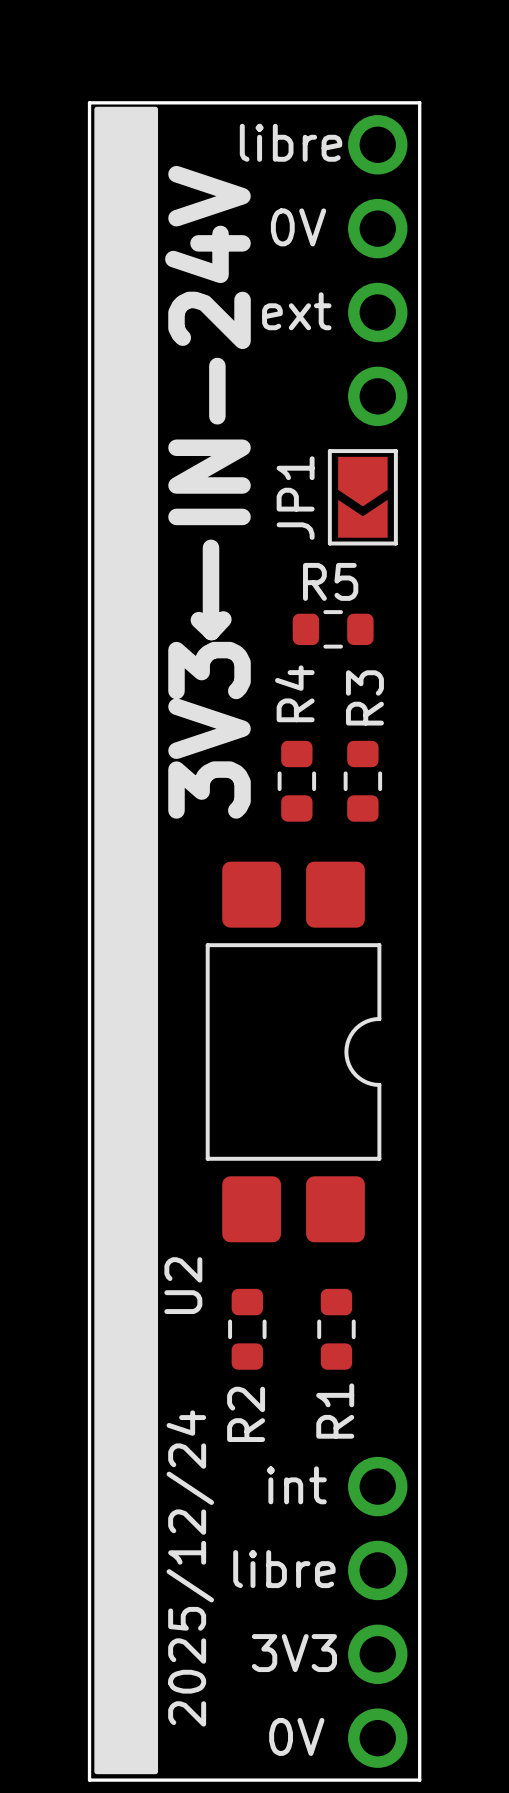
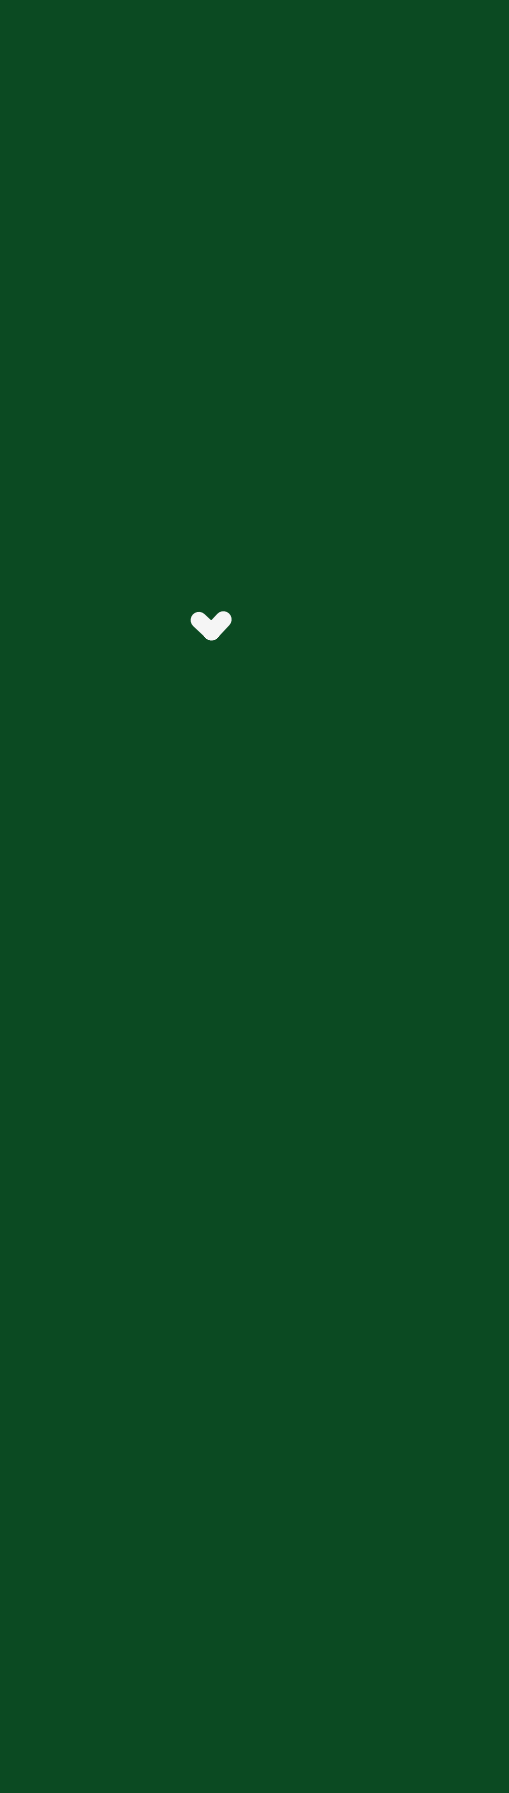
board edge: (89, 102) (89, 1780) (419, 1780) (419, 102) (89, 102) -> none
drawing: [94, 106, 159, 1775] -> none
text: libre (291, 142) -> none
part: (377, 144) -> none
text: 0V (298, 227) -> none
part: (377, 228) -> none
text: ext (296, 311) -> none
part: (377, 312) -> none
text: IN-24V (207, 345) -> none
part: (377, 396) -> none
JP1: (362, 497) -> none
line: (211, 547) (211, 631) -> none
R5: (333, 629) -> none
text: 3V3 (209, 730) -> none
R4: (296, 781) -> none
R3: (362, 781) -> none
U2: (293, 1051) -> none
R2: (247, 1329) -> none
R1: (336, 1329) -> none
text: int (296, 1485) -> none
part: (377, 1486) -> none
text: 2025/12/24 (190, 1568) -> none
text: libre (284, 1569) -> none
part: (377, 1570) -> none
text: 3V3 (294, 1653) -> none
part: (377, 1654) -> none
text: 0V (296, 1736) -> none
part: (377, 1738) -> none

